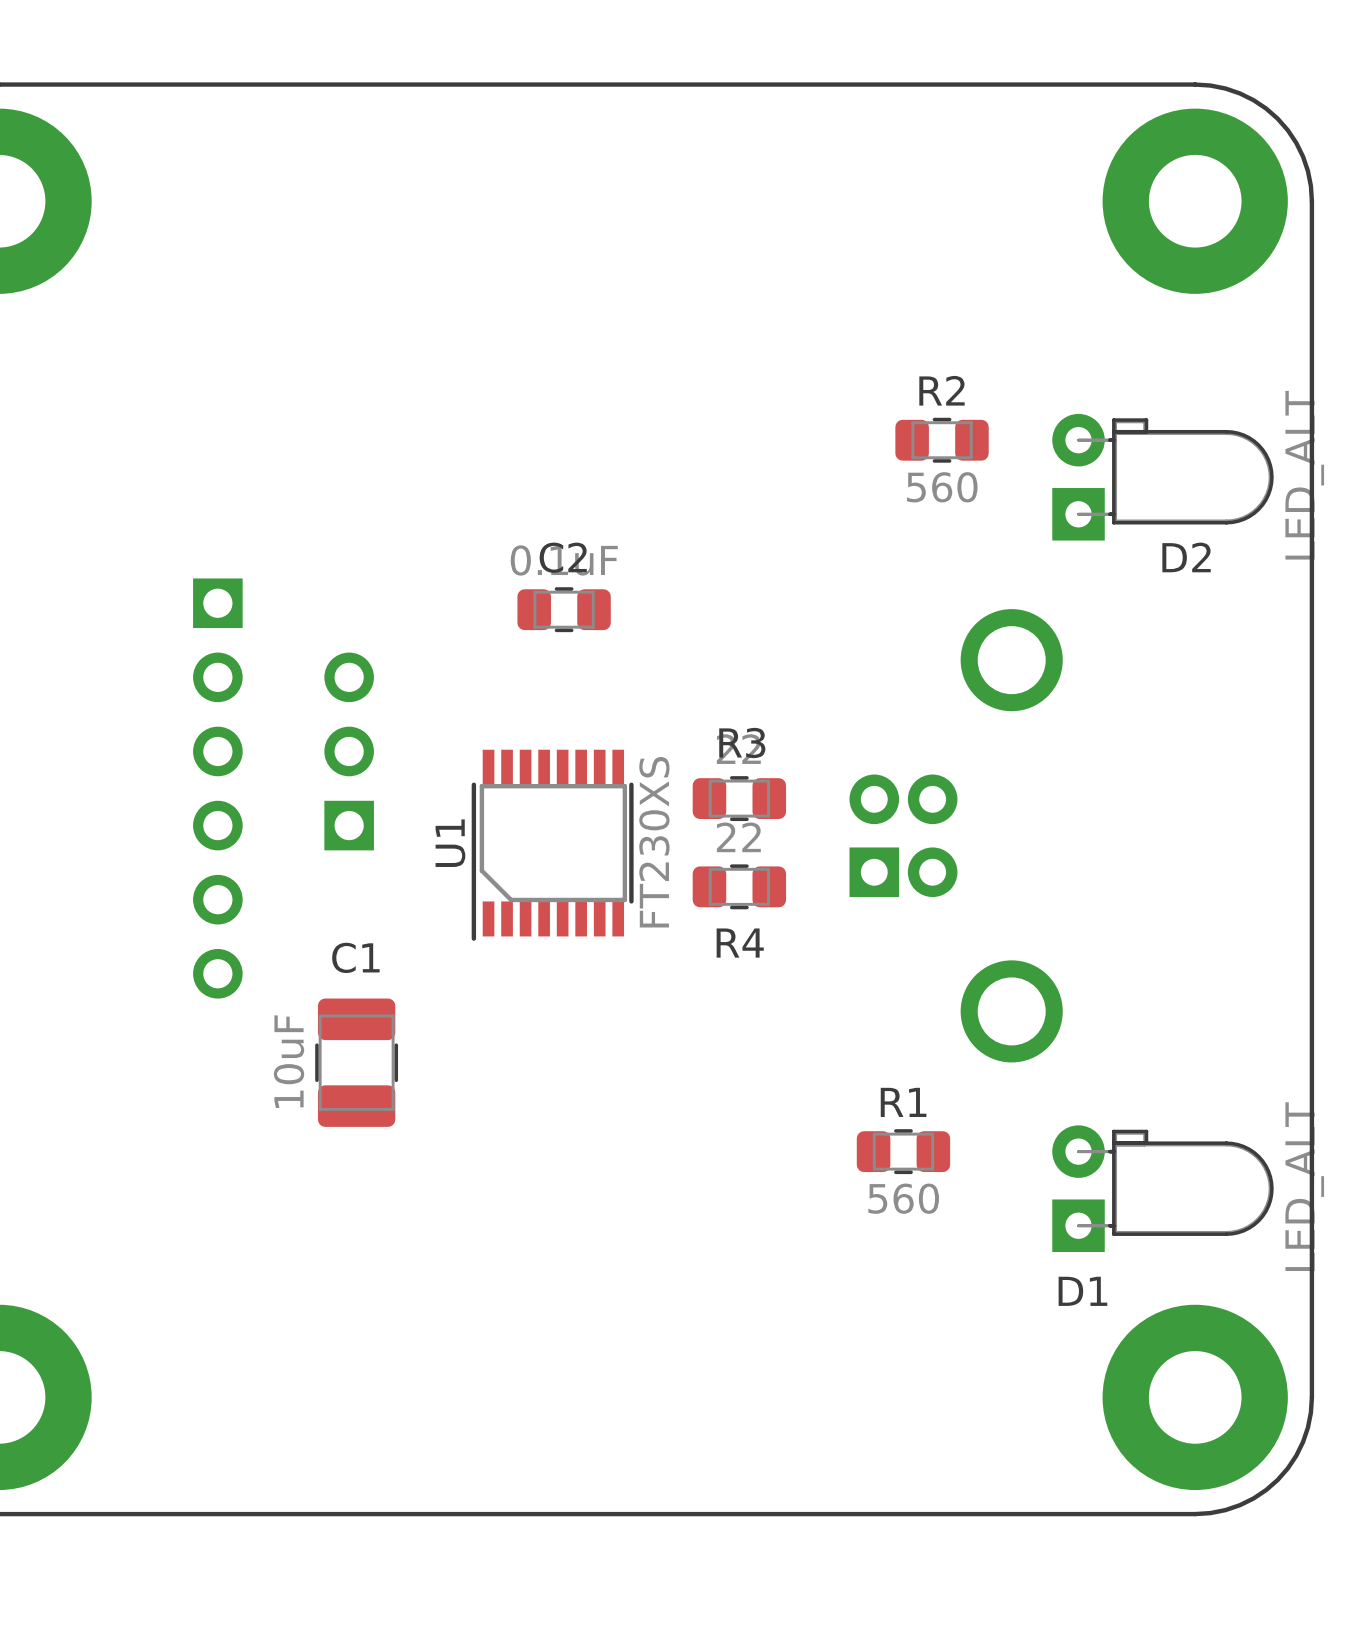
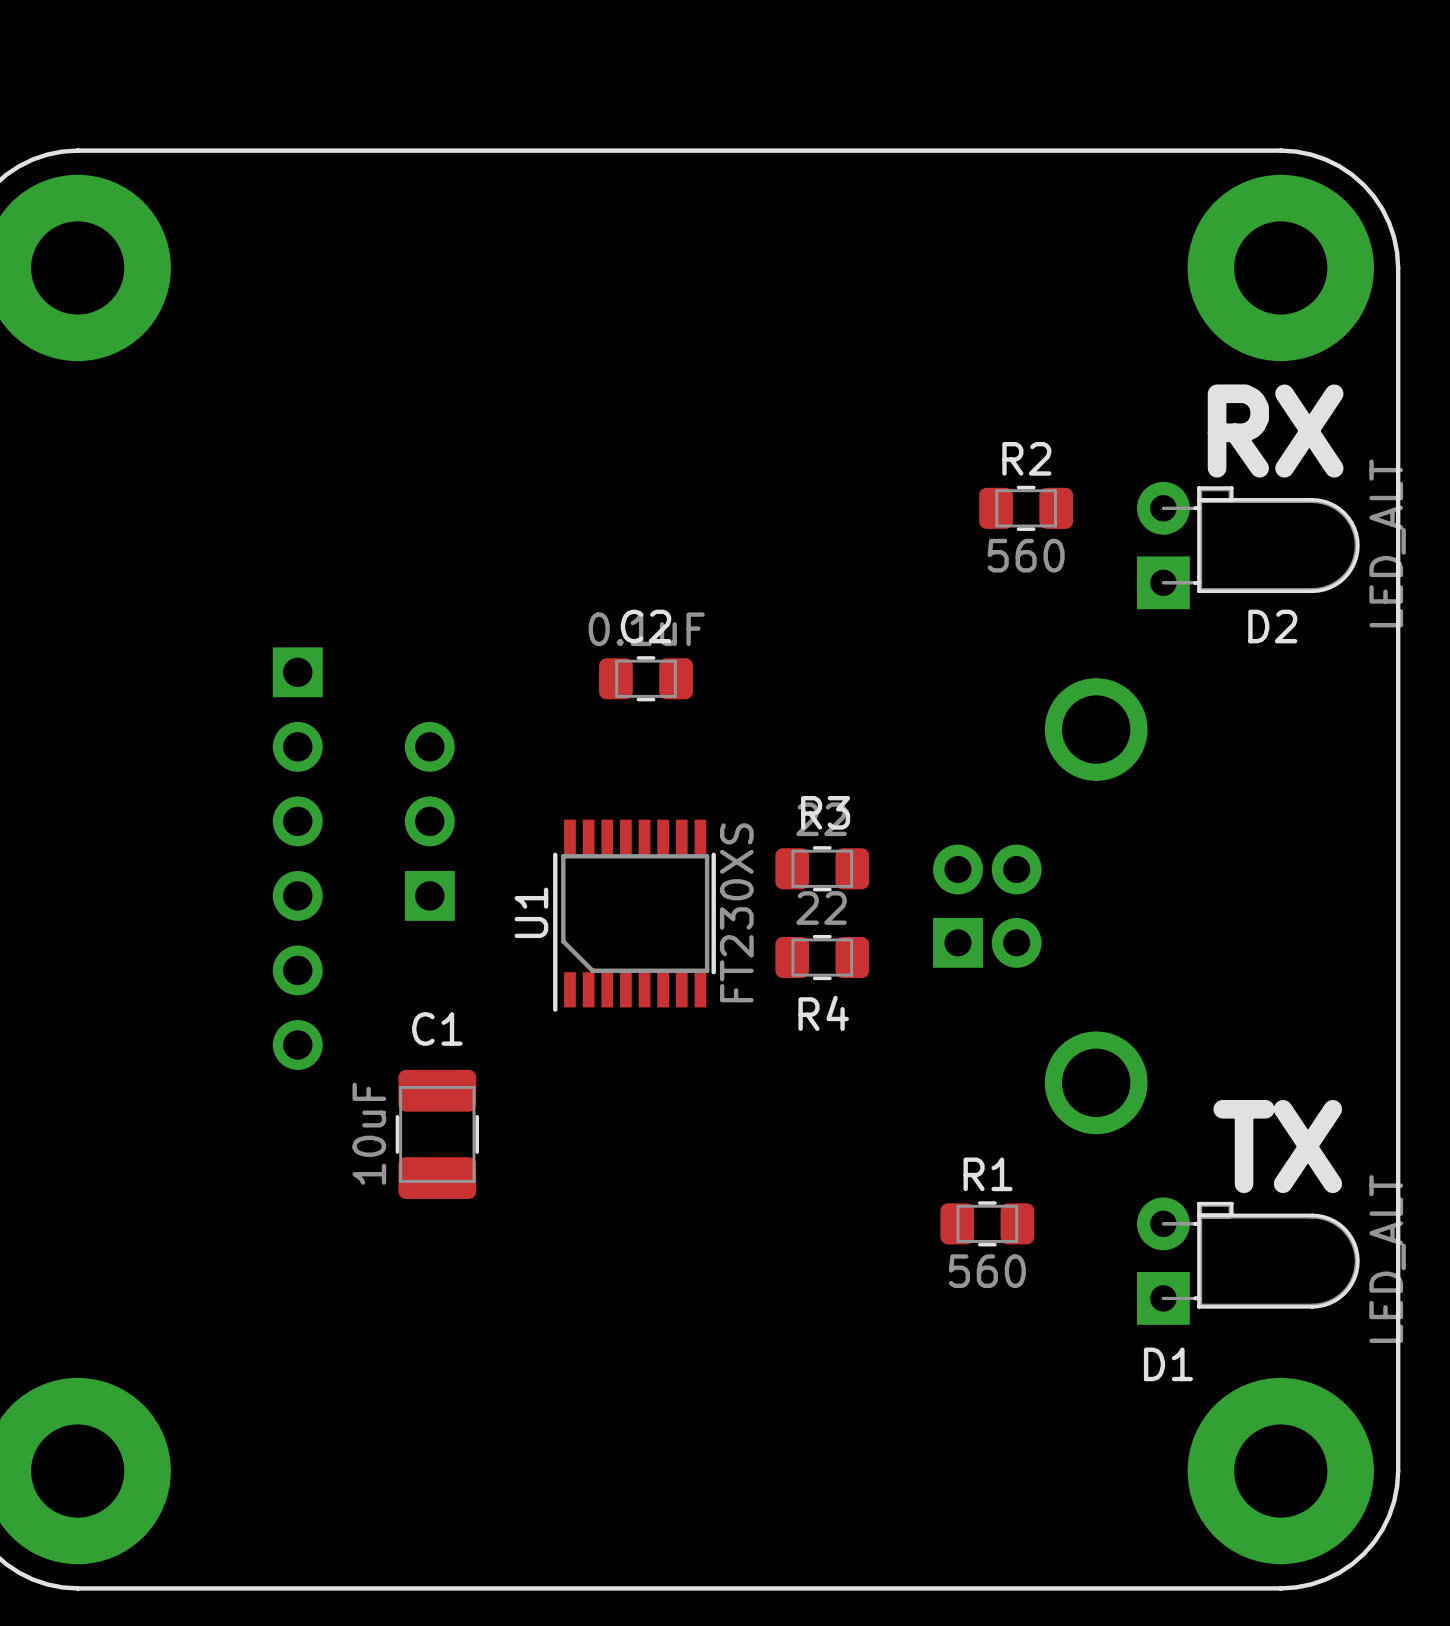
text: none -> RX (1275, 431)
text: none -> TX (1277, 1146)

